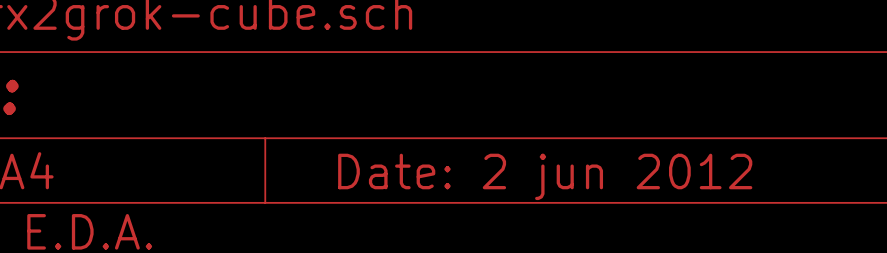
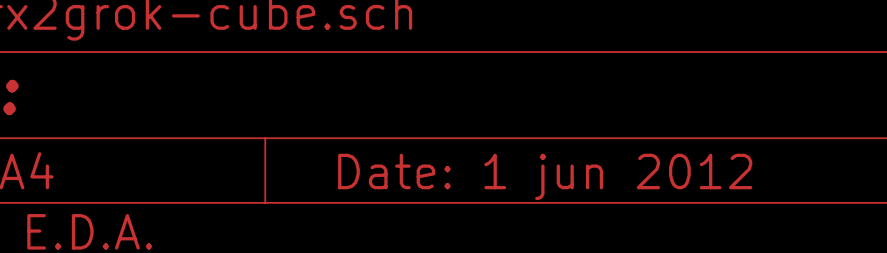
title block: Date: 2 jun 2012 (545, 176) -> Date: 1 jun 2012 (545, 176)

